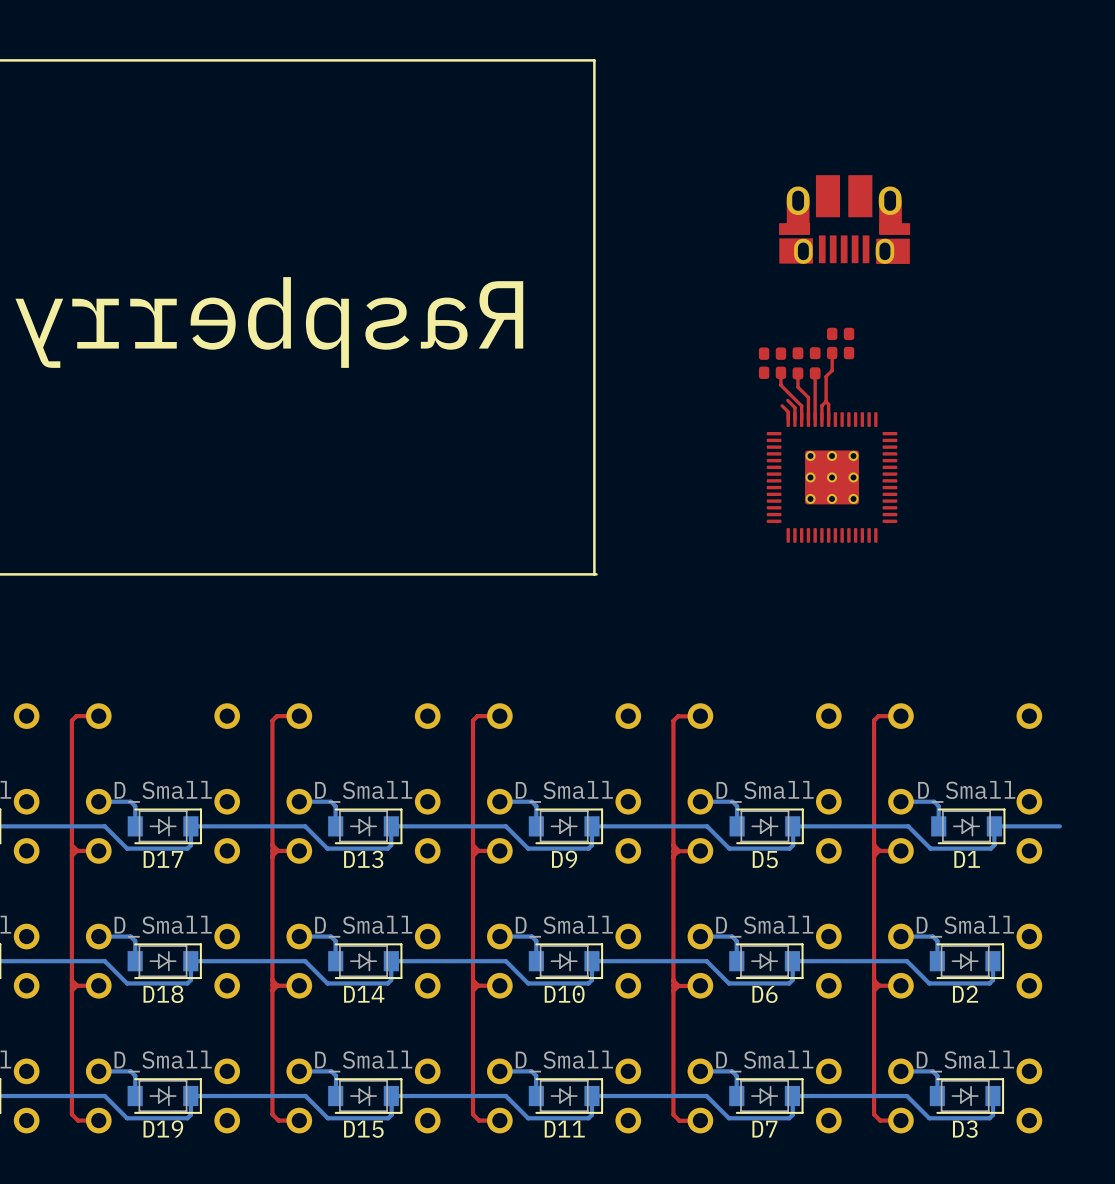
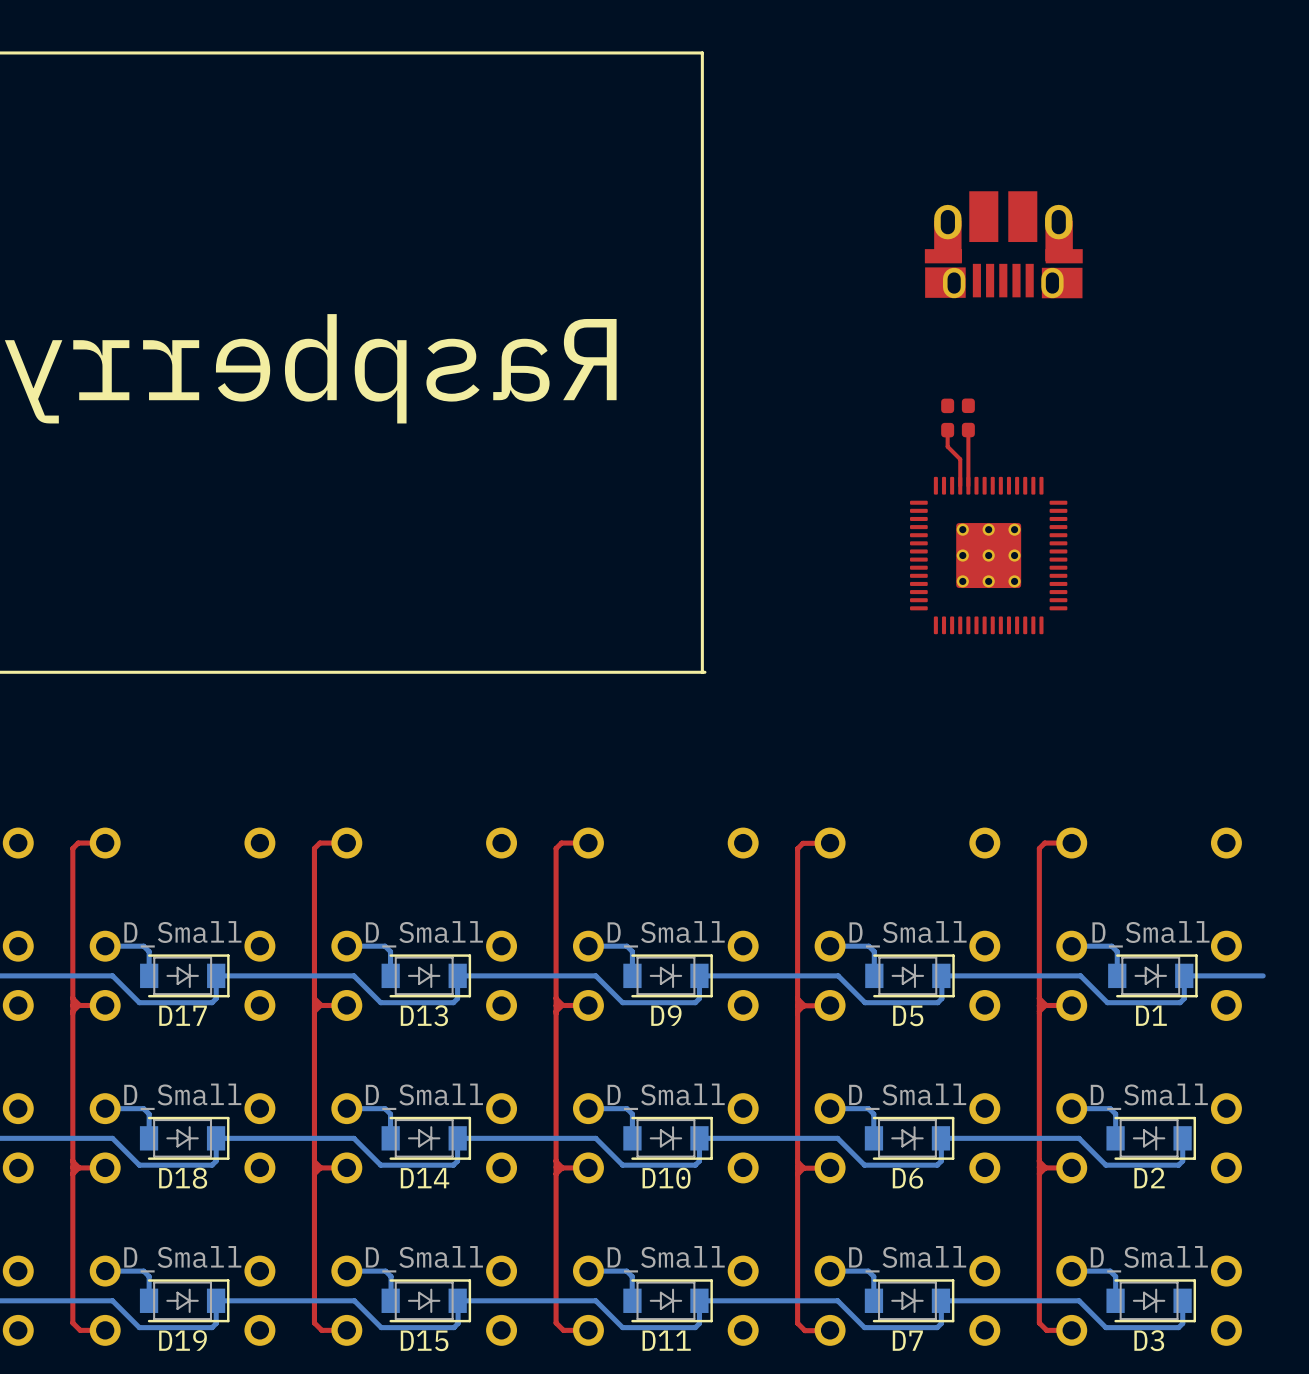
part: (832, 343) -> none
part: (849, 343) -> none
top track: (832, 353) (832, 370) (826, 376) (828, 419) -> none
part: (764, 363) -> none
part: (780, 363) -> none
top track: (780, 372) (780, 385) (801, 406) (801, 419) -> none
top track: (787, 400) (794, 407) (794, 419) -> none
top track: (826, 401) (821, 405) (821, 419) -> none
top track: (782, 405) (788, 411) (788, 419) -> none

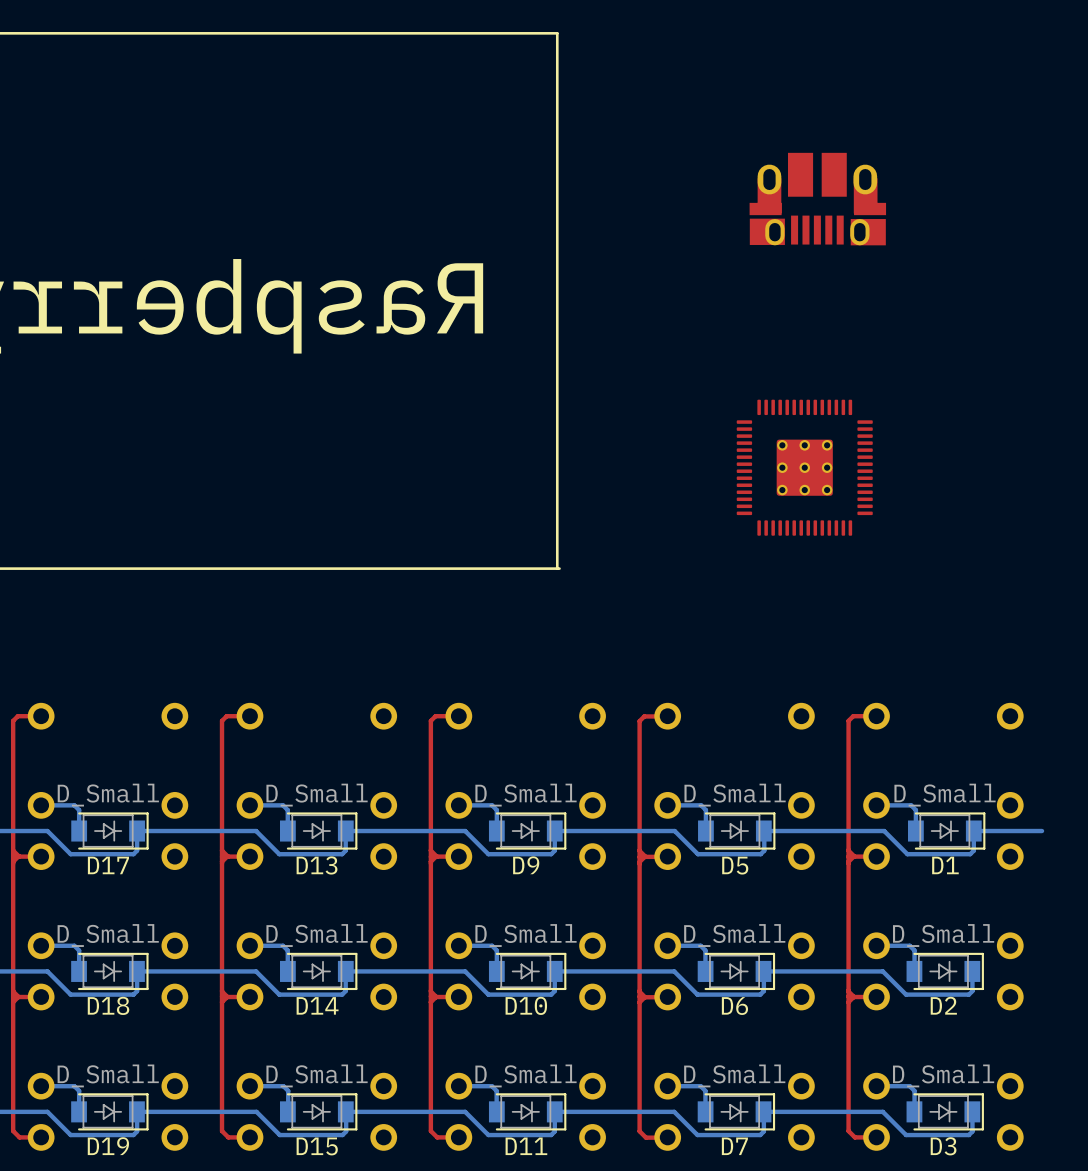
part: (968, 417) -> none
part: (947, 418) -> none
top track: (947, 430) (947, 446) (960, 459) (960, 485) -> none
top track: (968, 430) (968, 485) -> none

